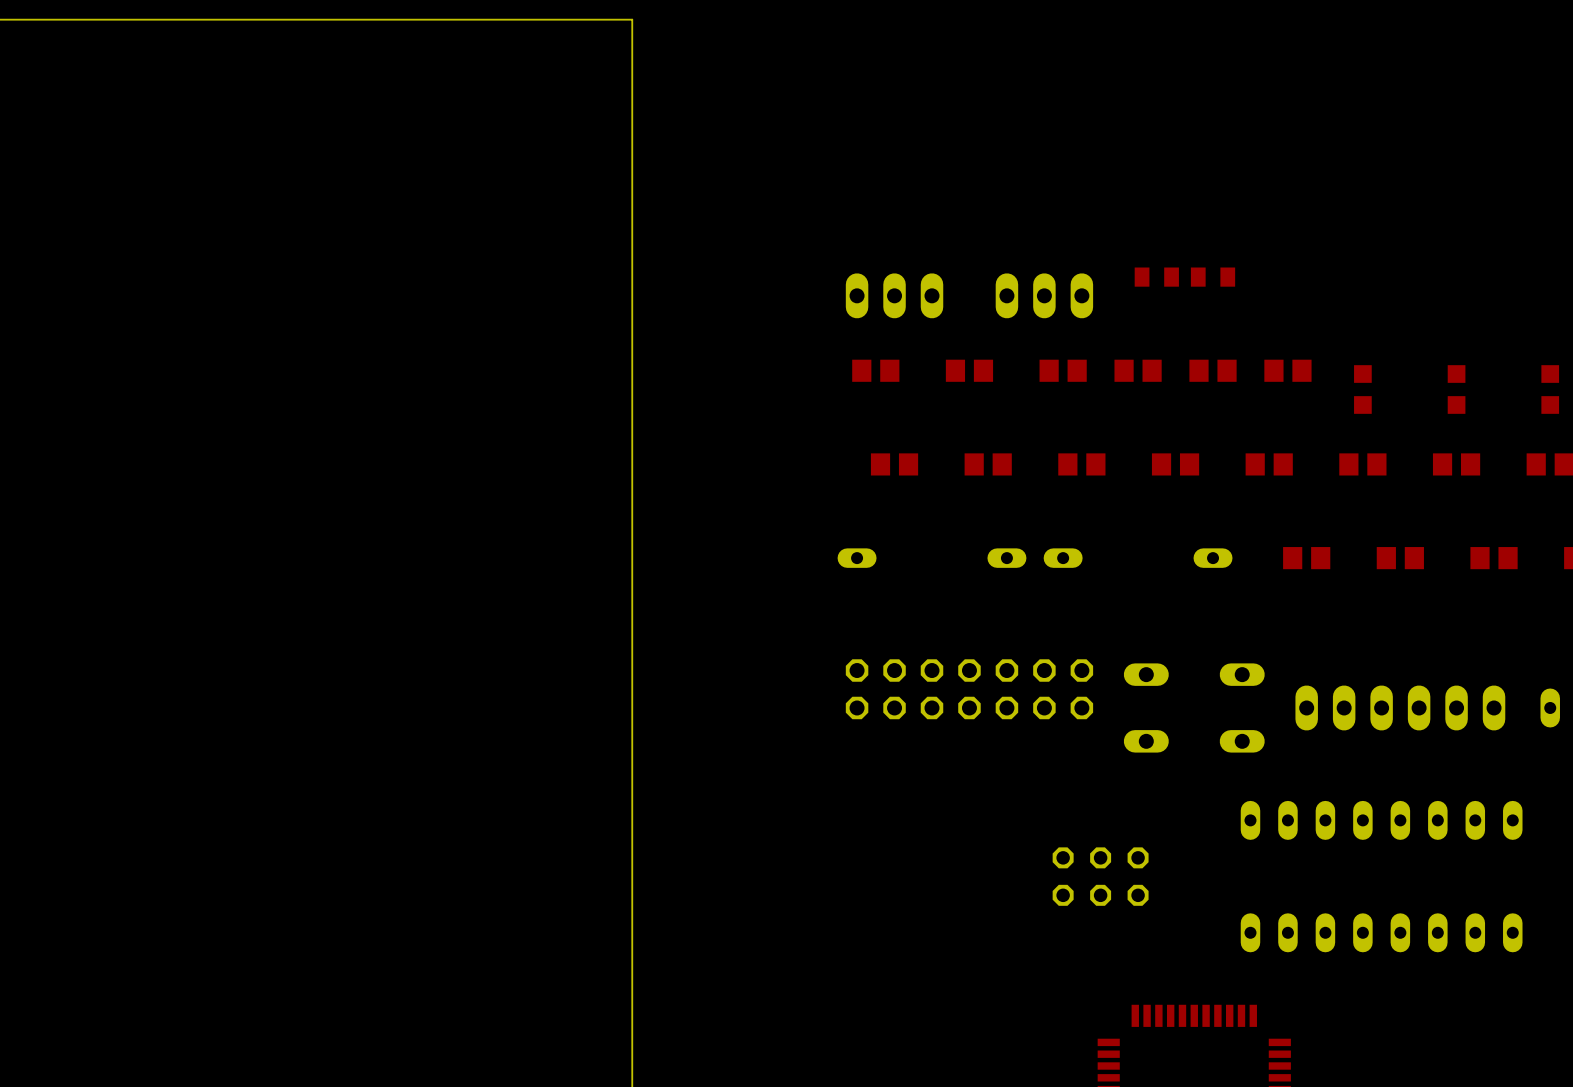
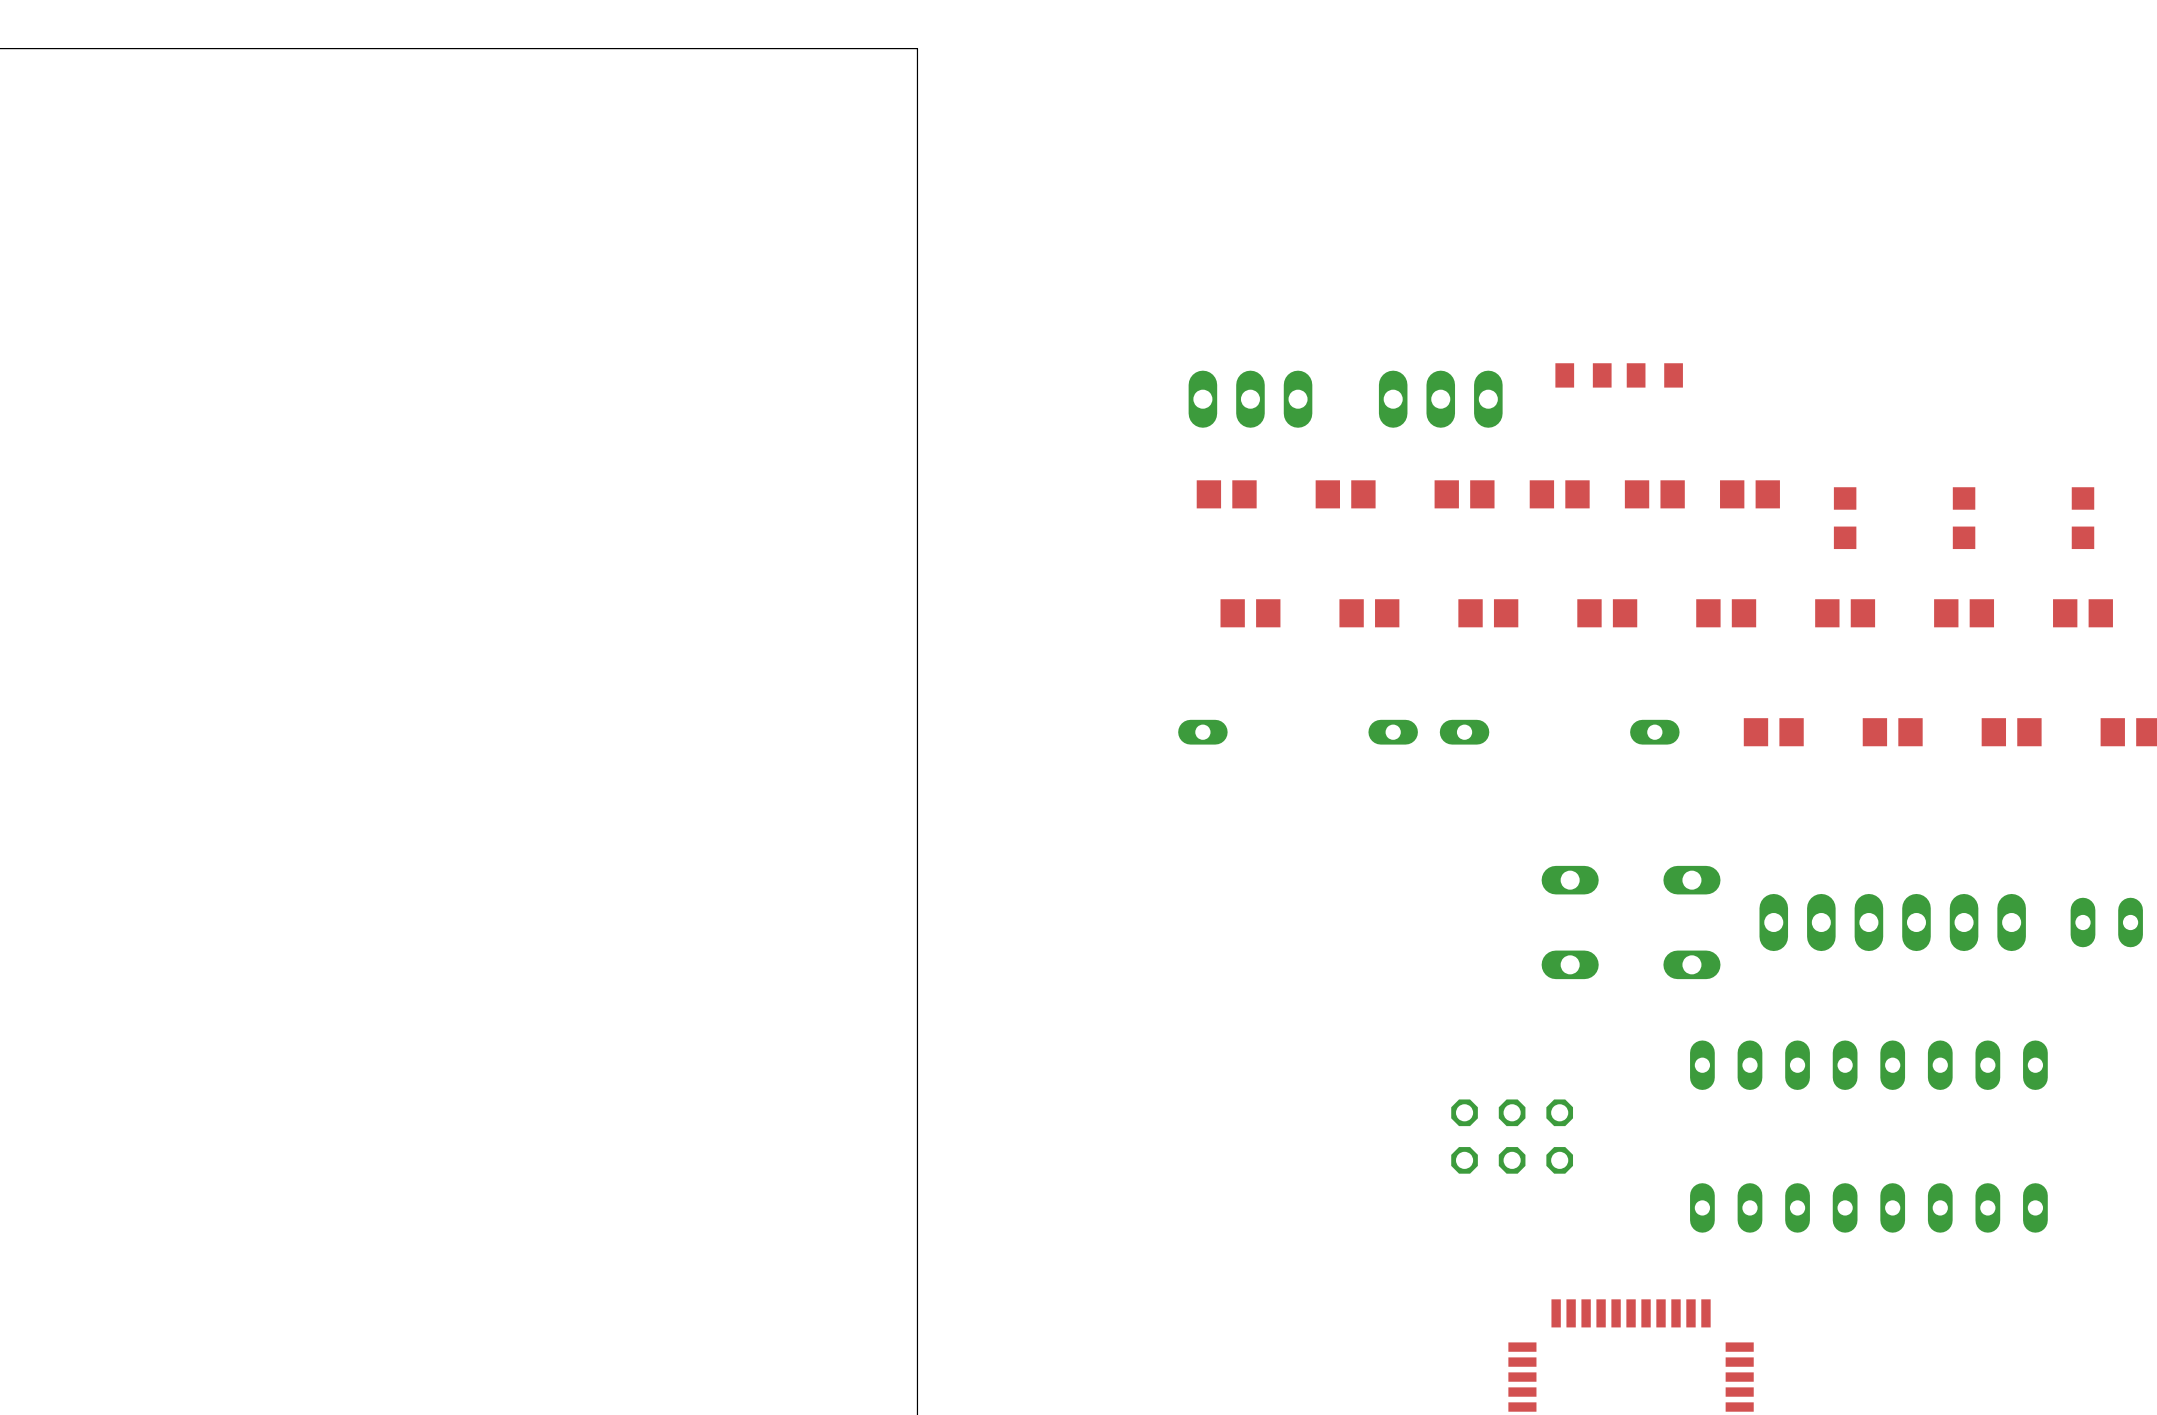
part: (969, 689) -> none

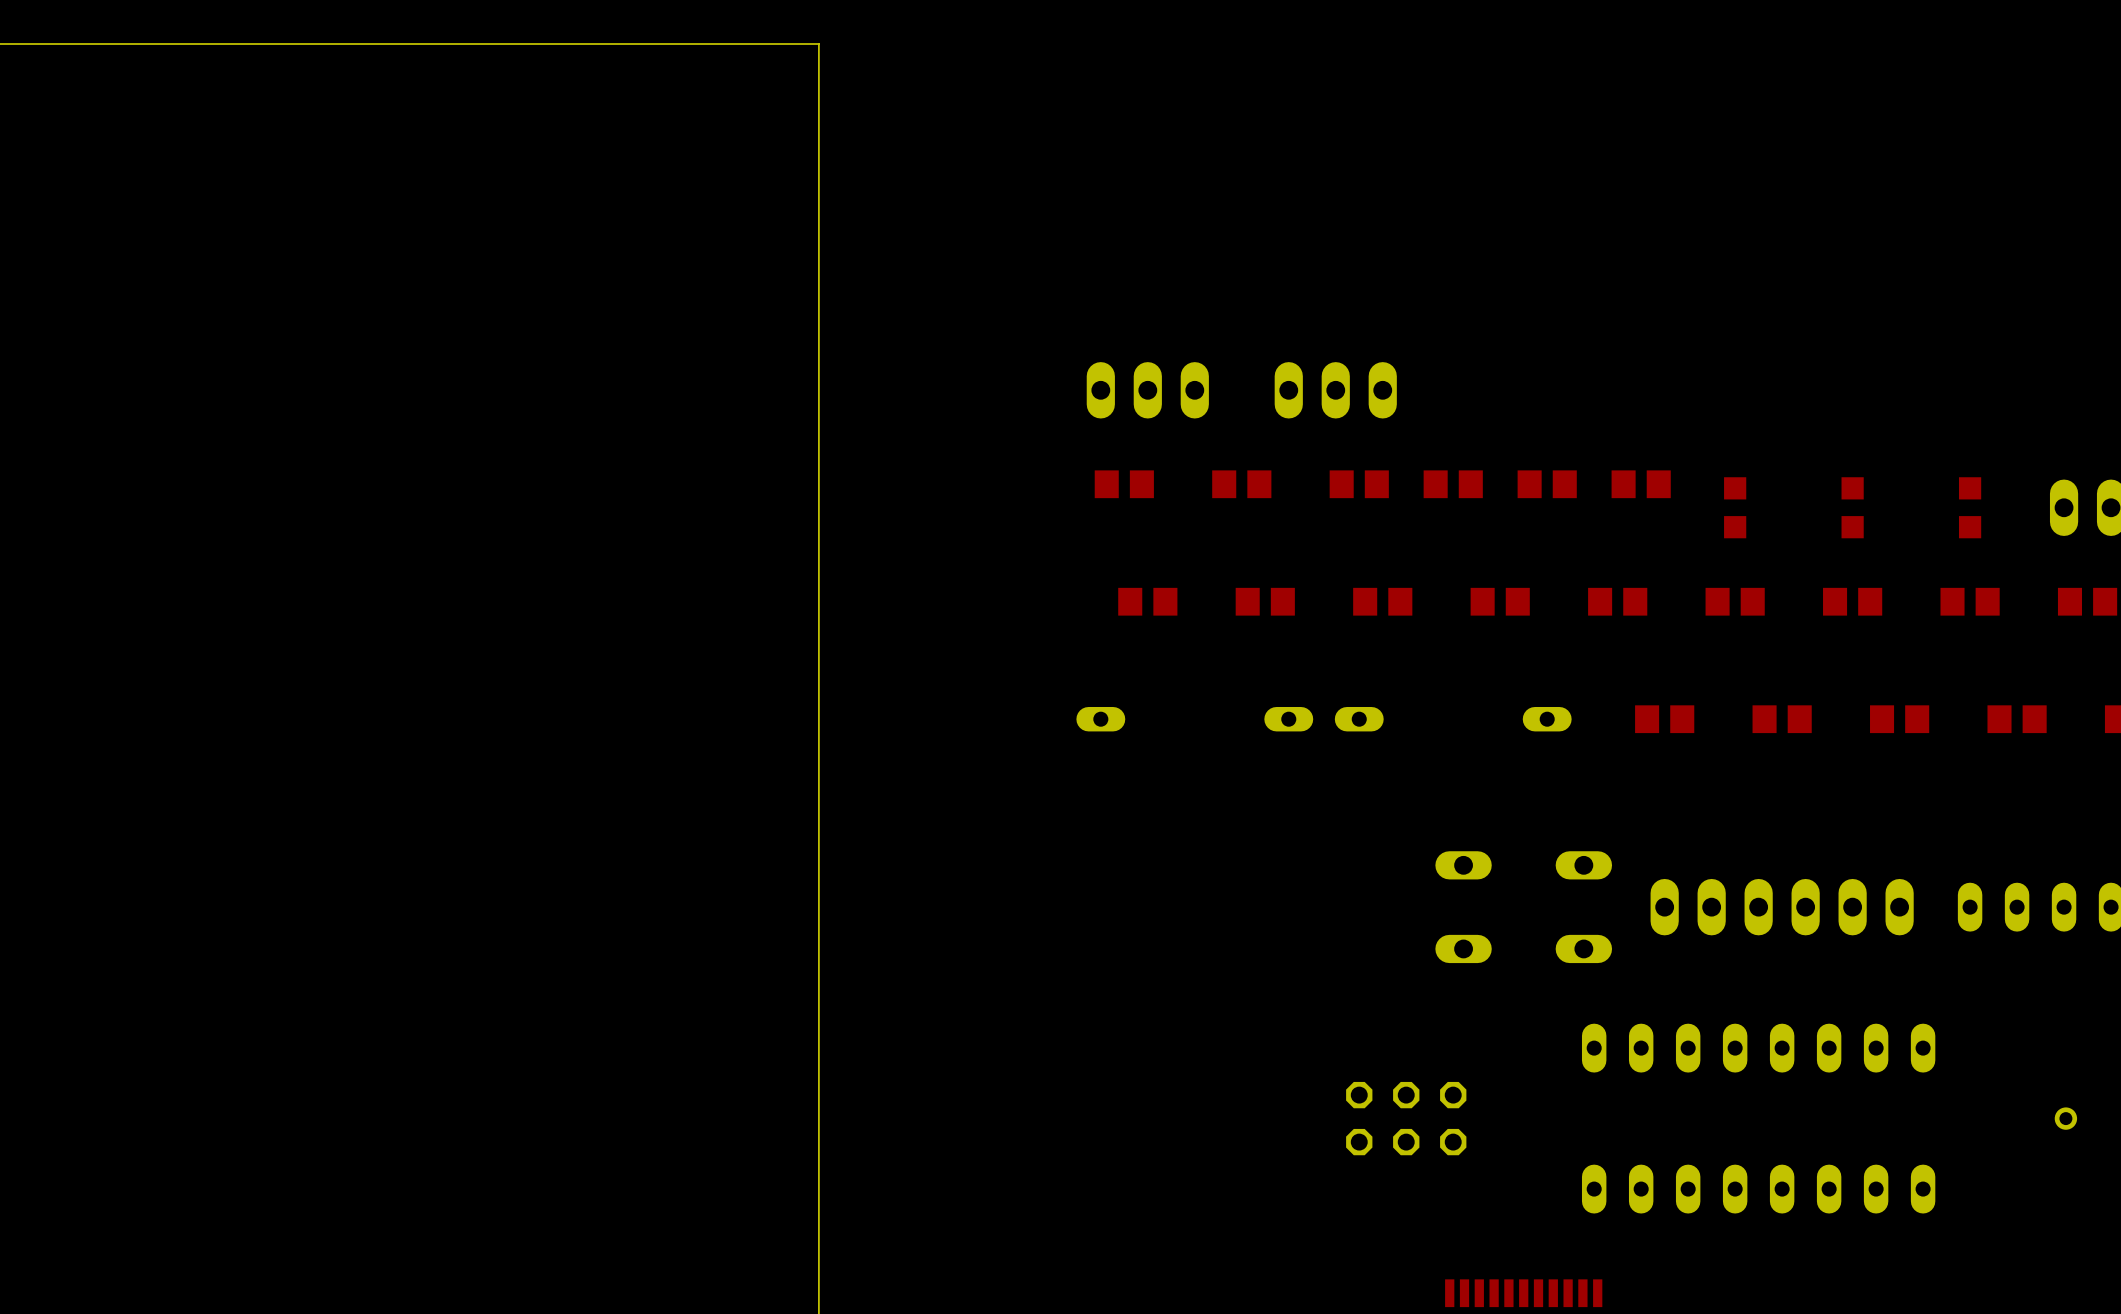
part: (1583, 375) -> none
part: (1654, 375) -> none

